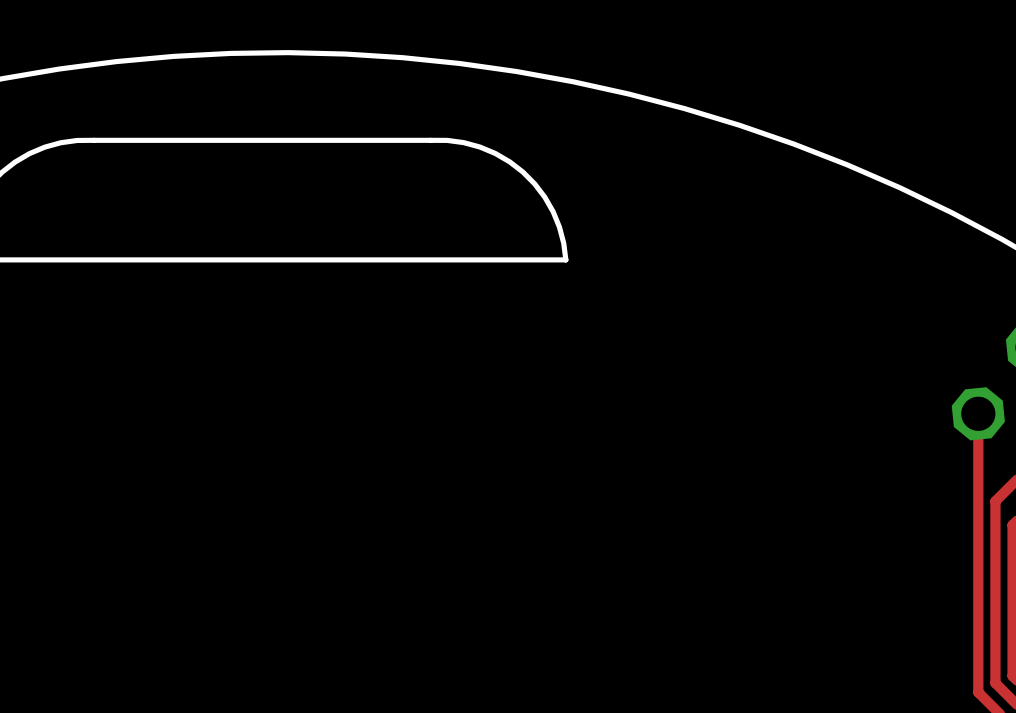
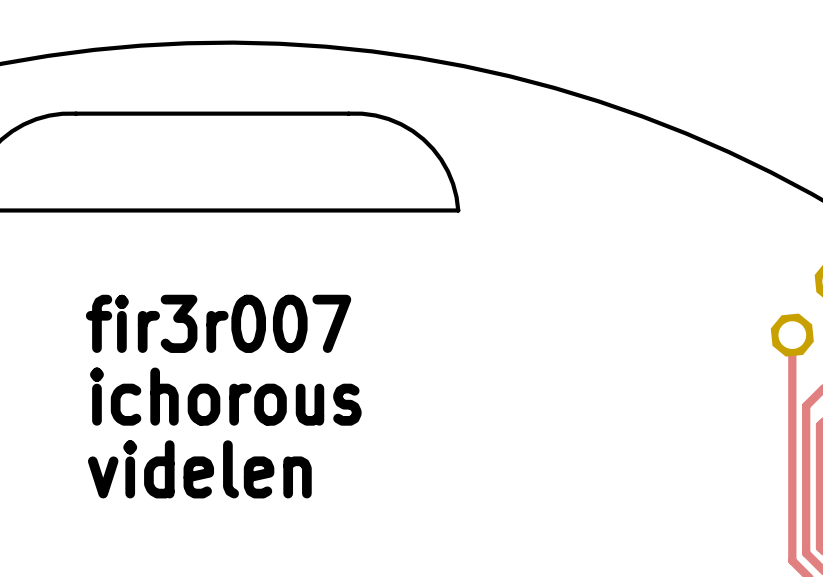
text: none -> fir3r007 (218, 323)
text: none -> ichorous (225, 396)
text: none -> videlen (199, 469)

